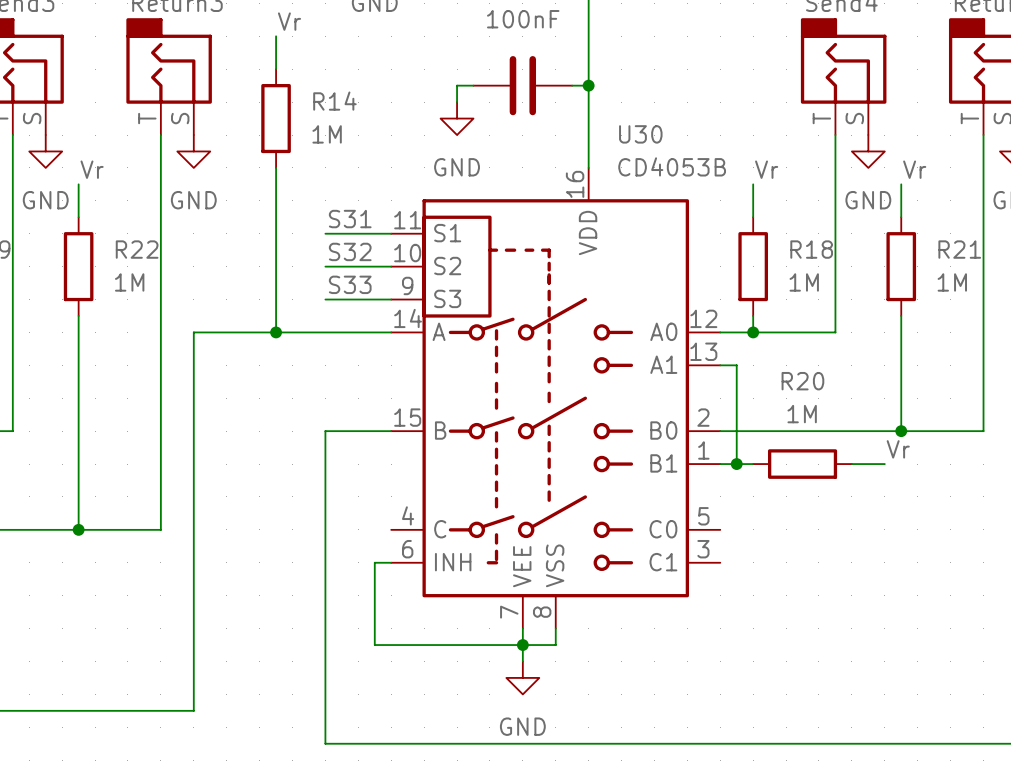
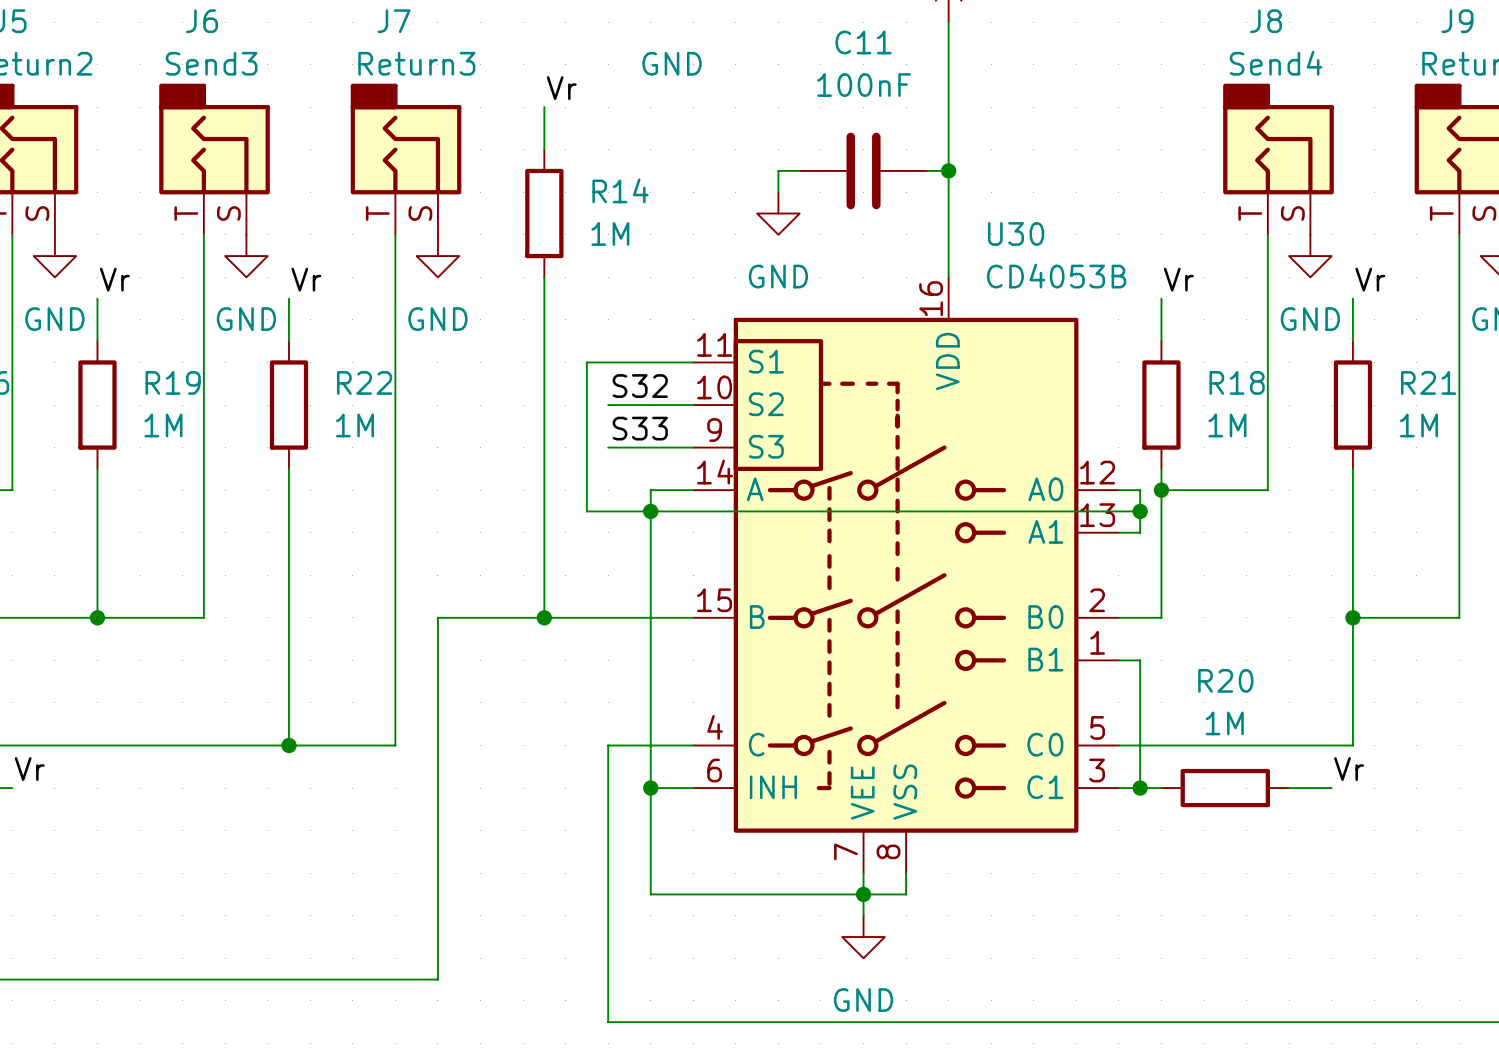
label: S31 (350, 219) -> none
wire: none -> (608, 362) (586, 362) (586, 511) (1140, 511)
wire: none -> (544, 490) (544, 617)
junction: (276, 332) -> none
wire: (358, 332) (193, 332) (193, 431) -> (608, 617) (437, 617)
wire: none -> (650, 490) (650, 894) (672, 894)
wire: (736, 332) (753, 332) -> (1140, 490) (1140, 532)
wire: none -> (1161, 490) (1161, 617)
junction: none -> (650, 511)
junction: none -> (1140, 511)
wire: (736, 365) (736, 464) (753, 464) -> none
junction: none -> (544, 617)
wire: (325, 431) (325, 529) -> (693, 745) (608, 745)
wire: (753, 431) (901, 431) -> (1118, 745) (1352, 745) (1352, 617)
label position: Vr (898, 449) -> Vr (1349, 769)
wire: none -> (1140, 660) (1140, 788)
junction: (736, 464) -> none
R20 position: (802, 464) -> (1225, 788)
wire: (851, 464) (884, 464) -> (1289, 788) (1331, 788)
junction: none -> (650, 788)
wire: (374, 562) (374, 645) -> (672, 788) (650, 788)
wire: none -> (1118, 788) (1161, 788)
junction: none -> (1140, 788)

